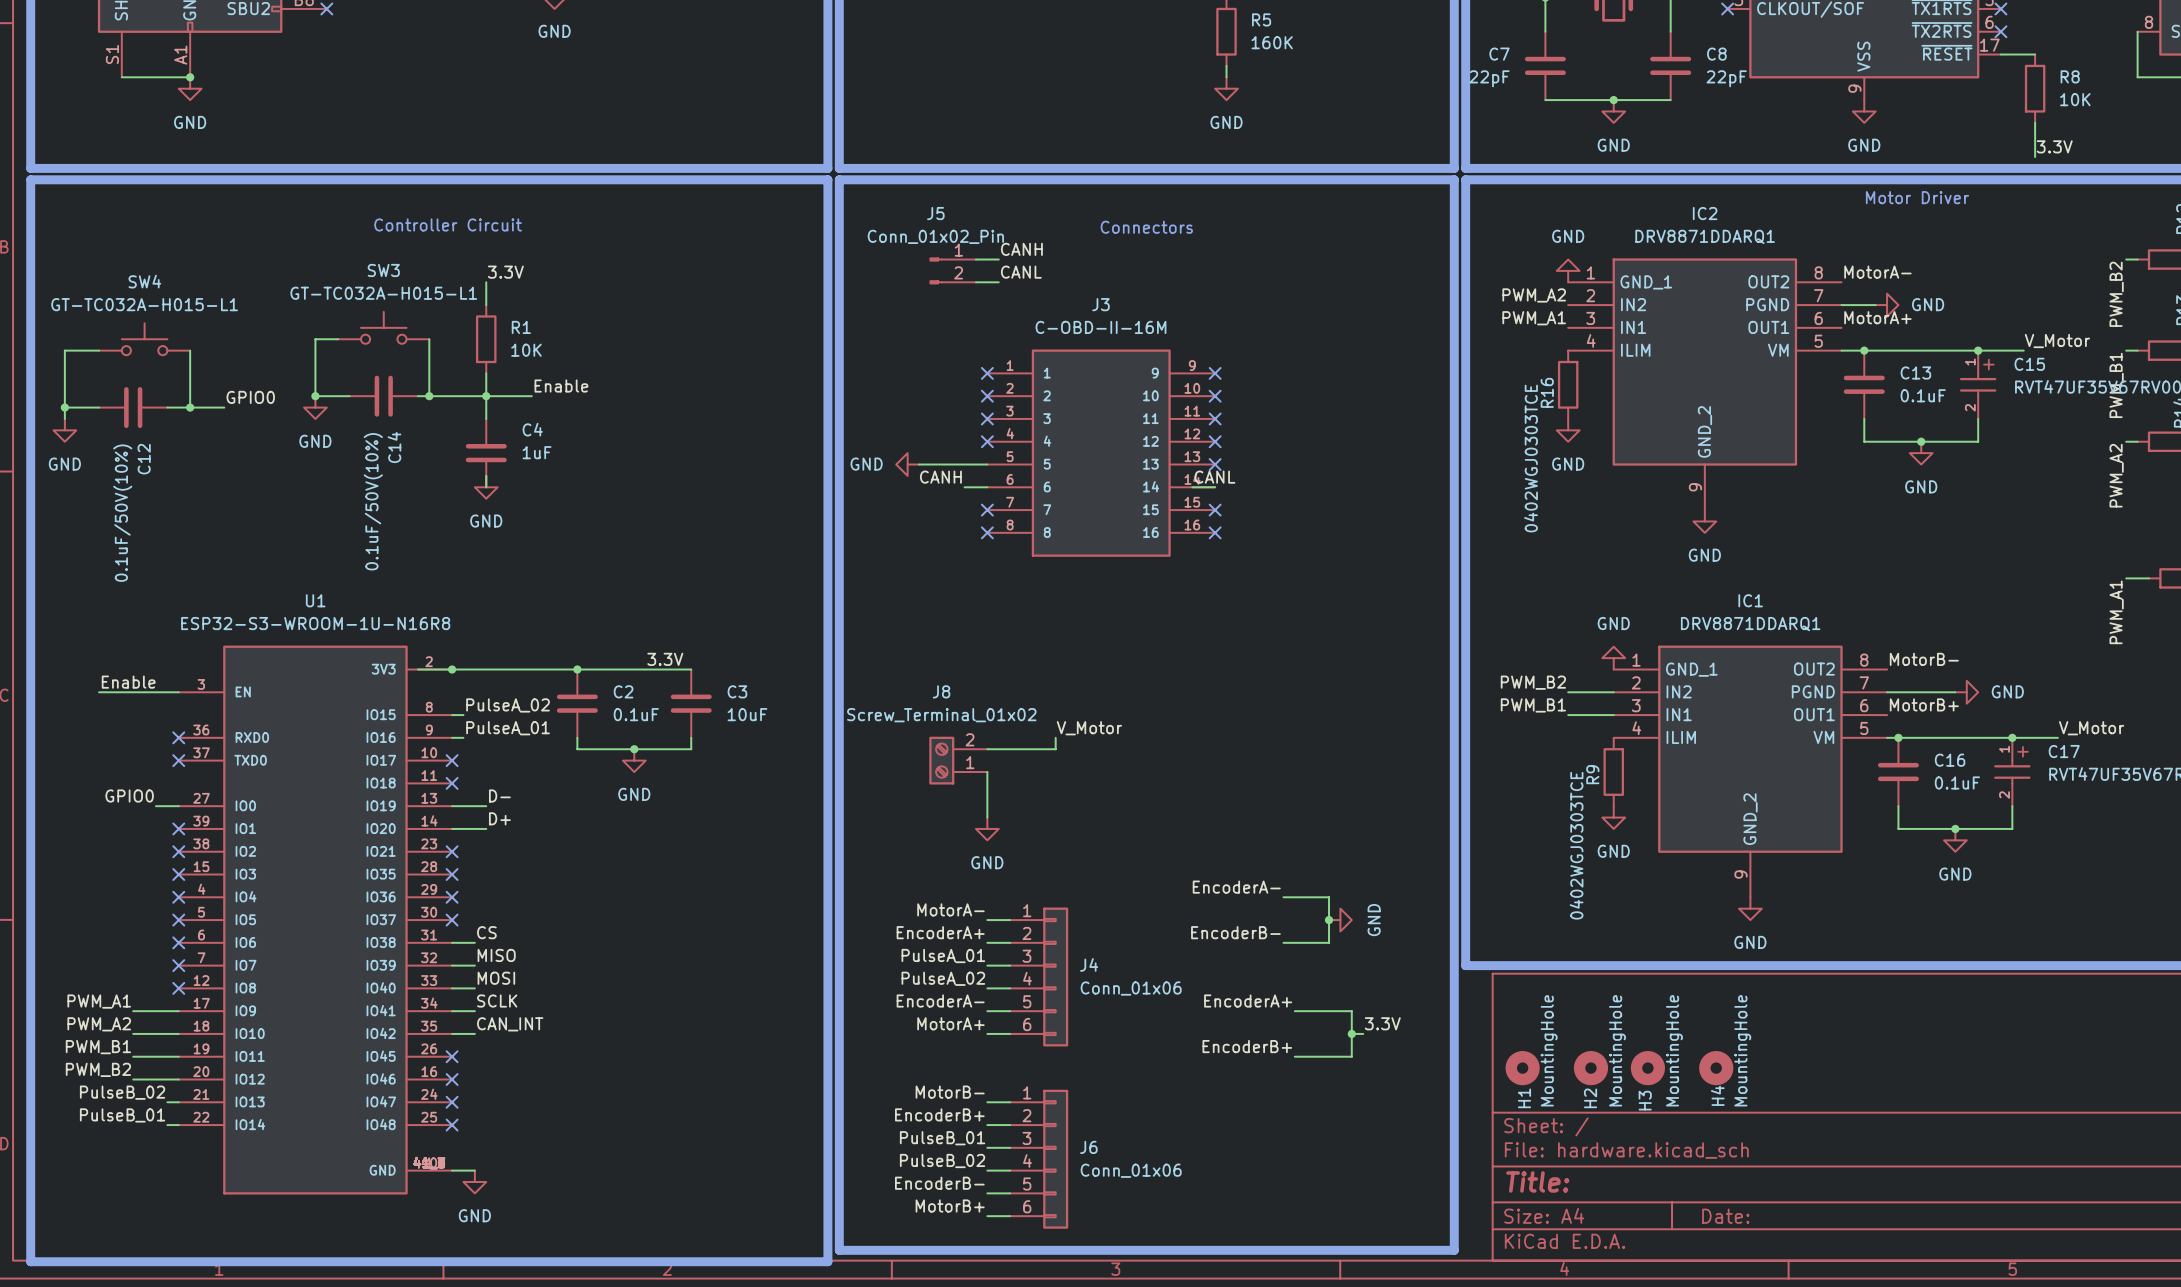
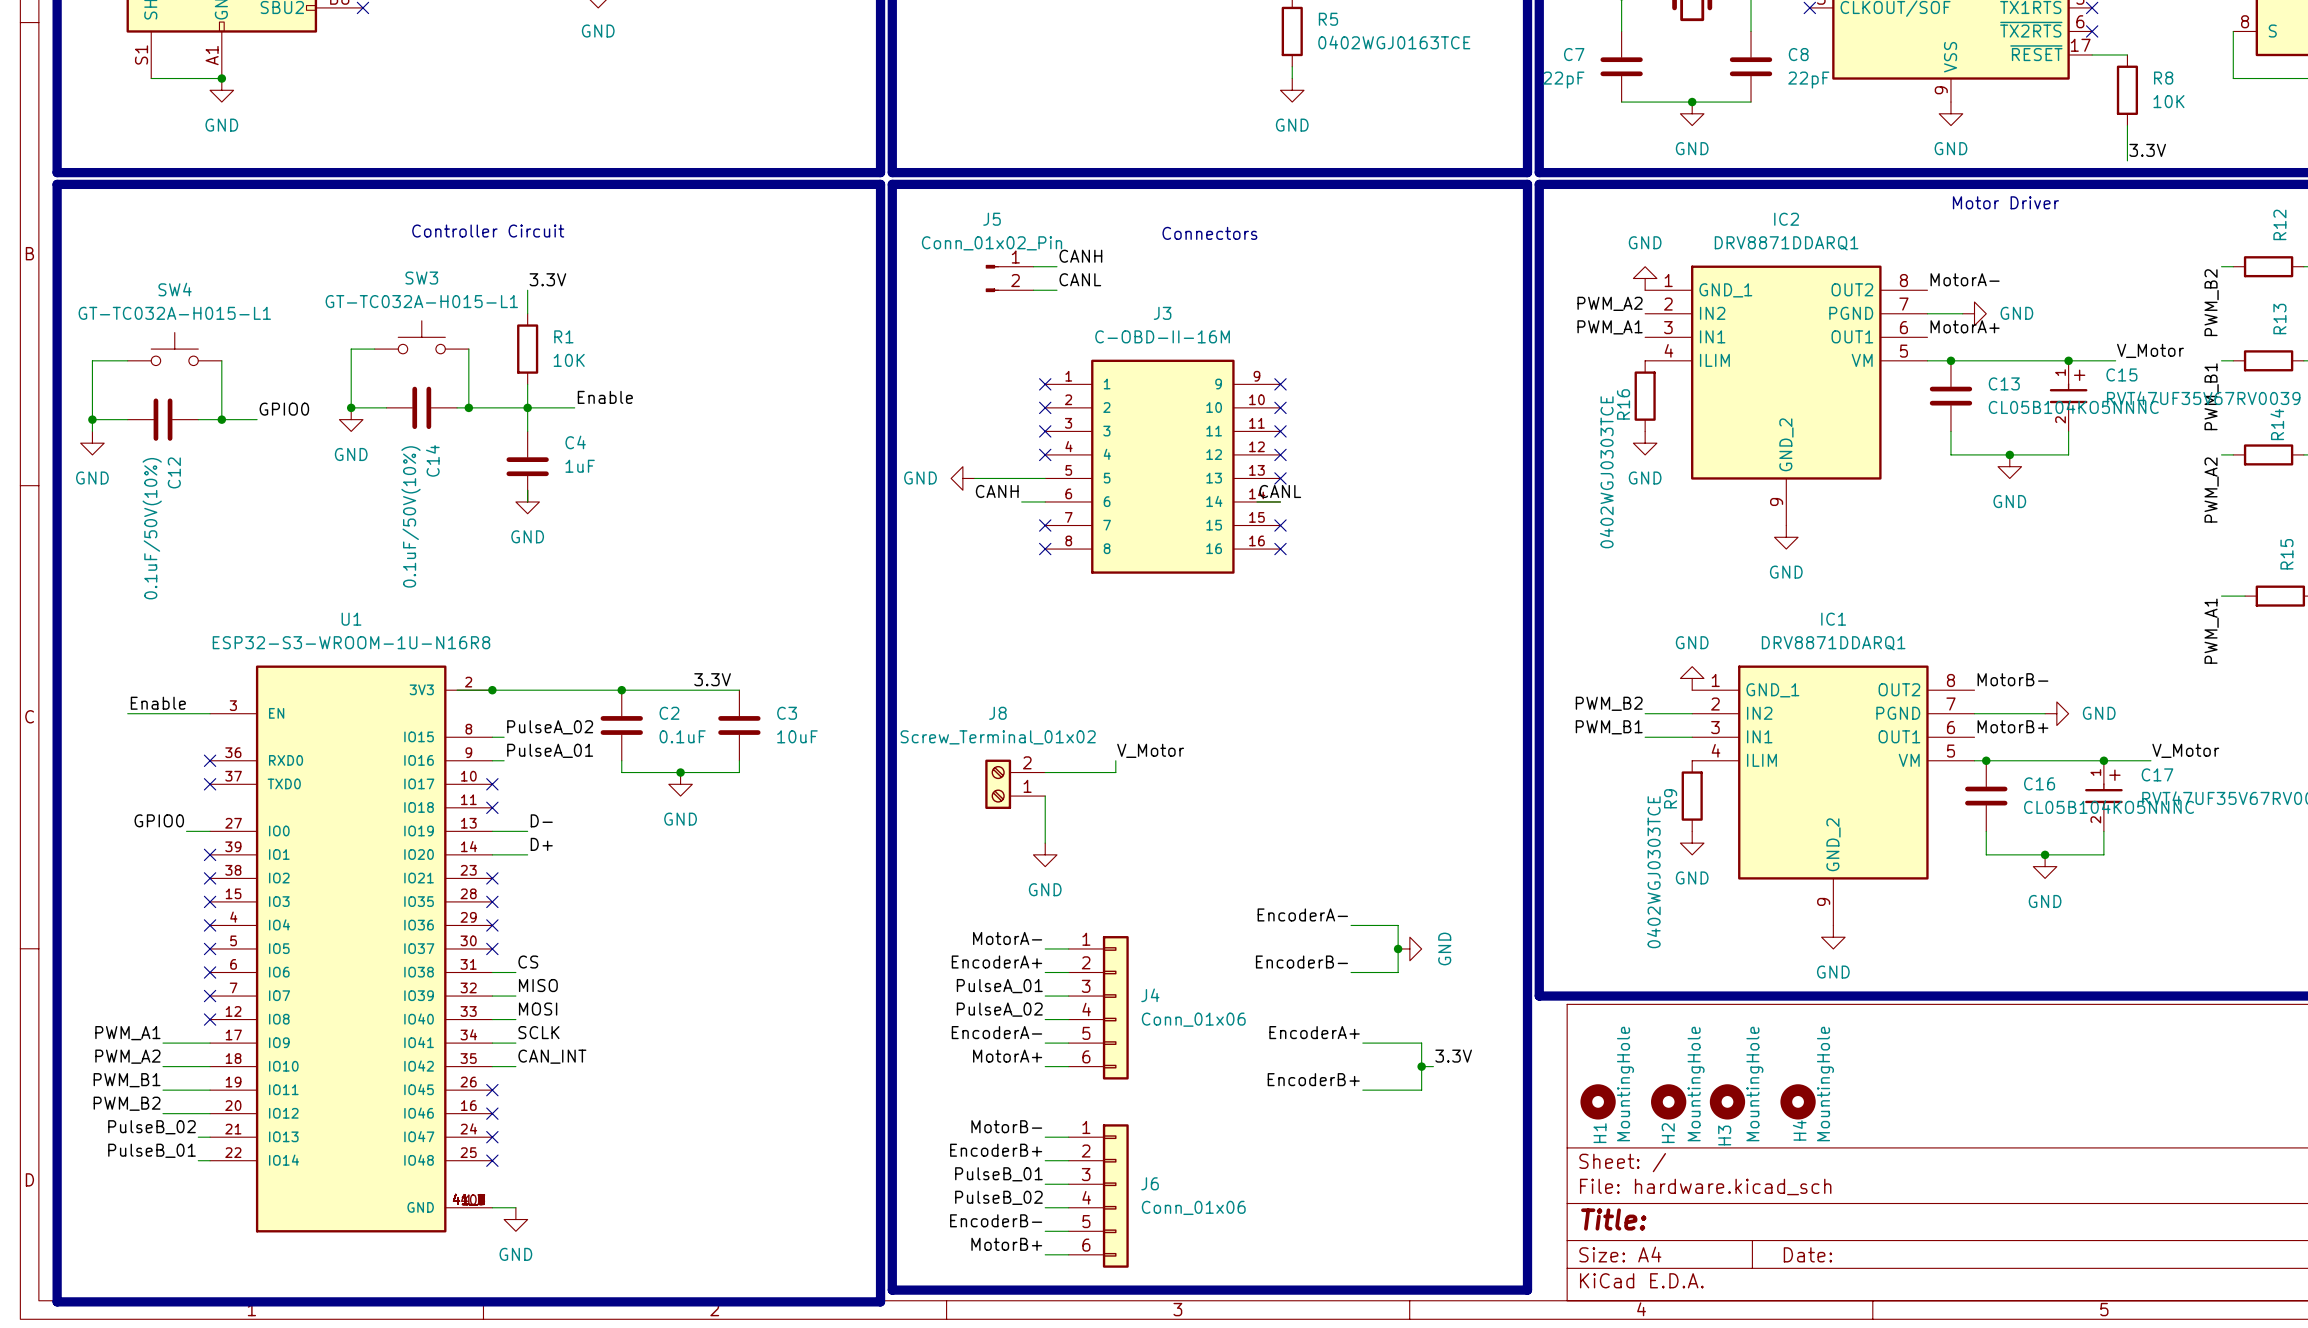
R5 value: 160K (1272, 42) -> 0402WGJ0163TCE (1394, 42)
C13 value: 0.1uF (1923, 395) -> CL05B104KO5NNNC (2073, 407)
C16 value: 0.1uF (1957, 782) -> CL05B104KO5NNNC (2109, 807)

